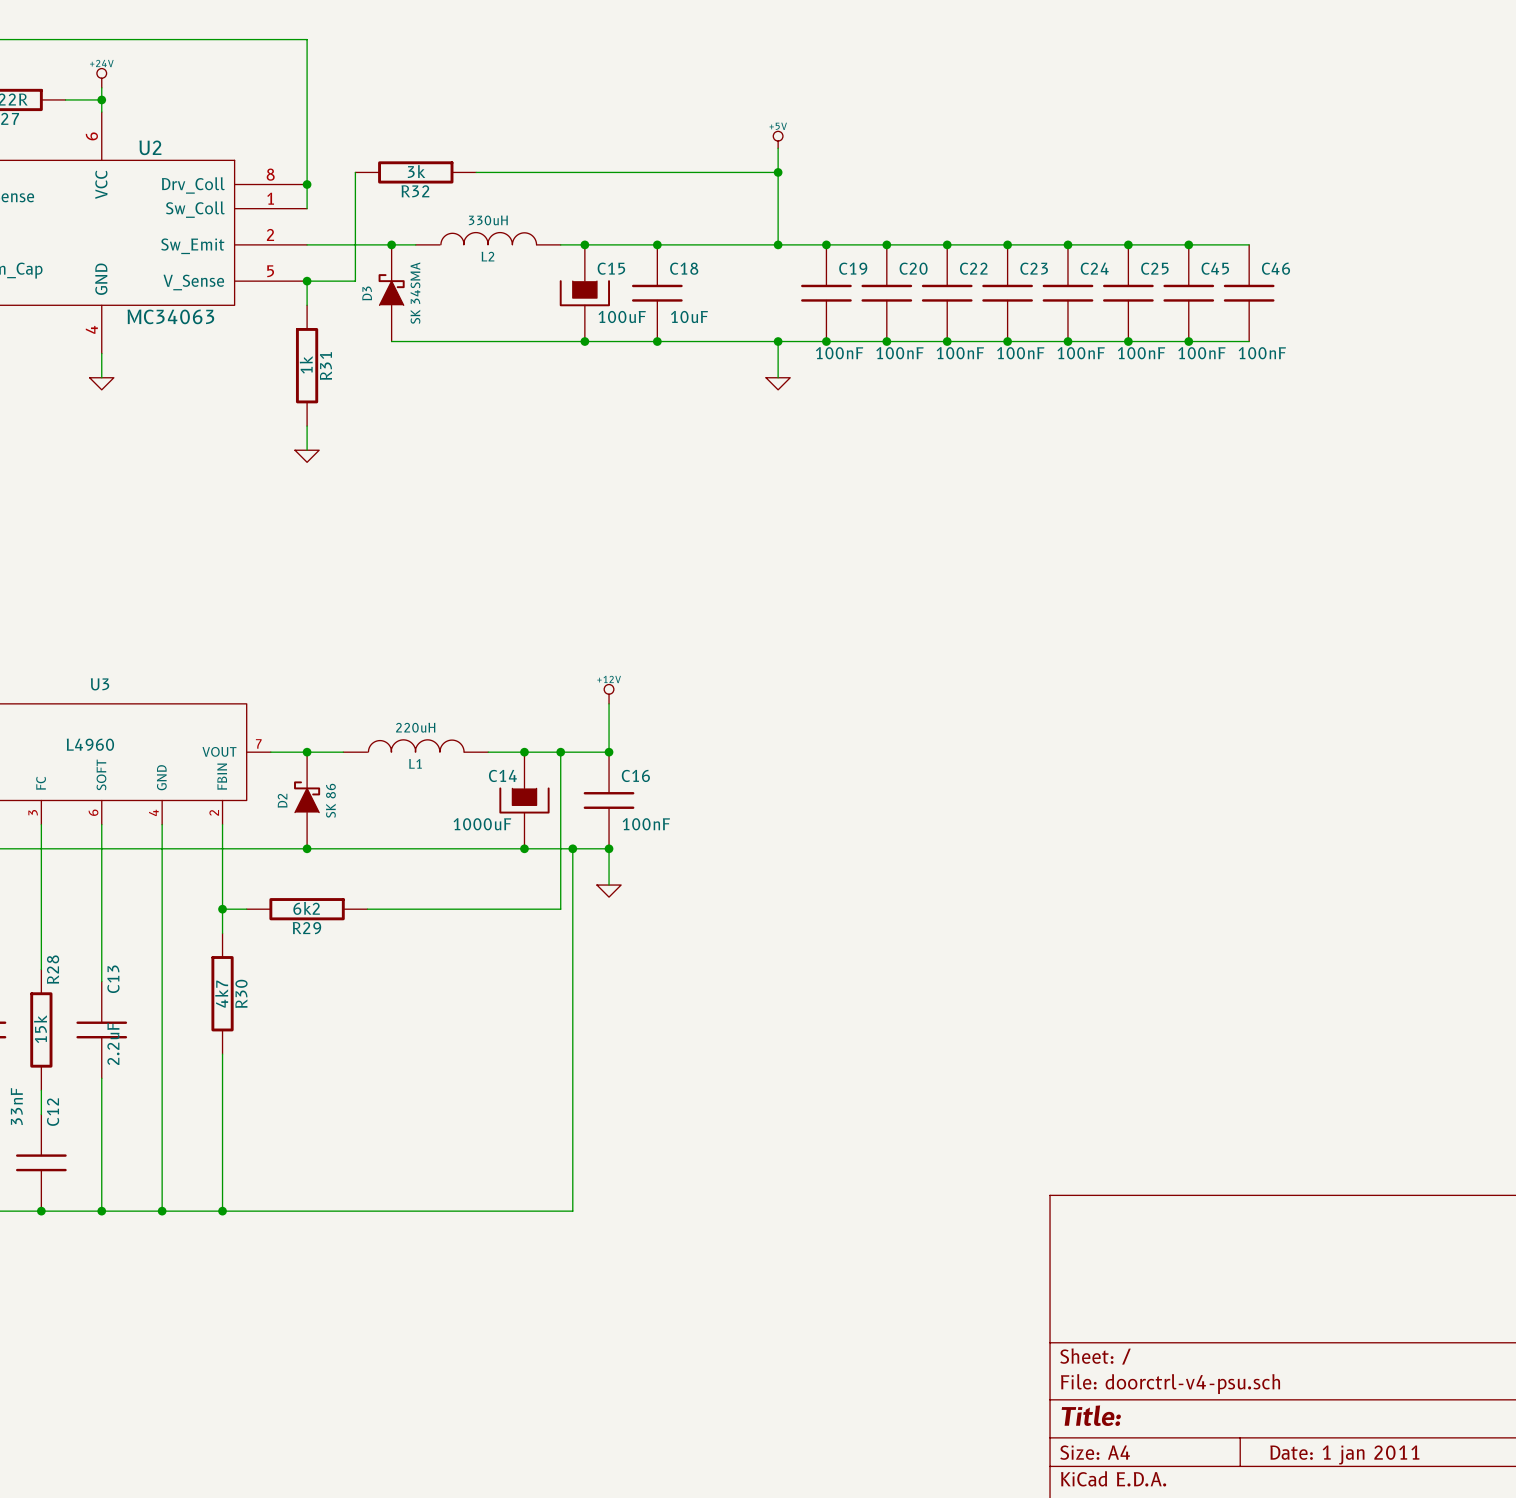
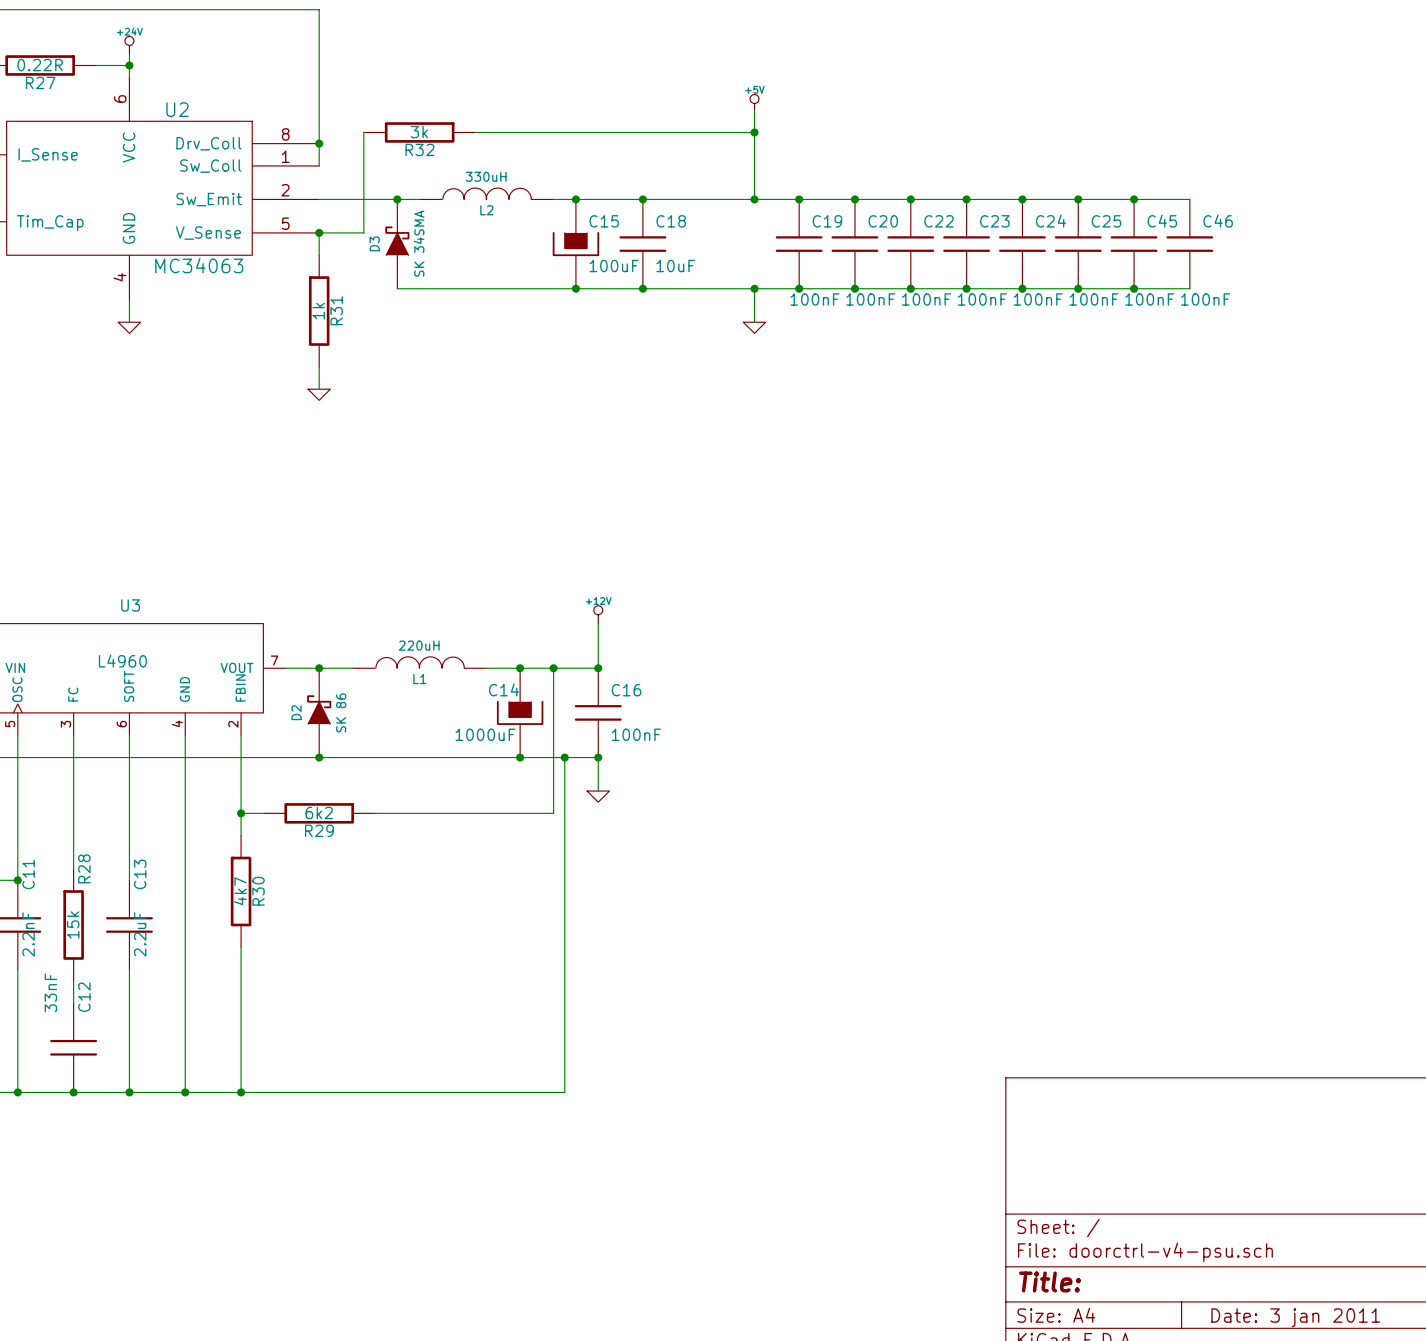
title block: Date: 1 jan 2011 (1344, 1454) -> Date: 3 jan 2011 (1295, 1317)

